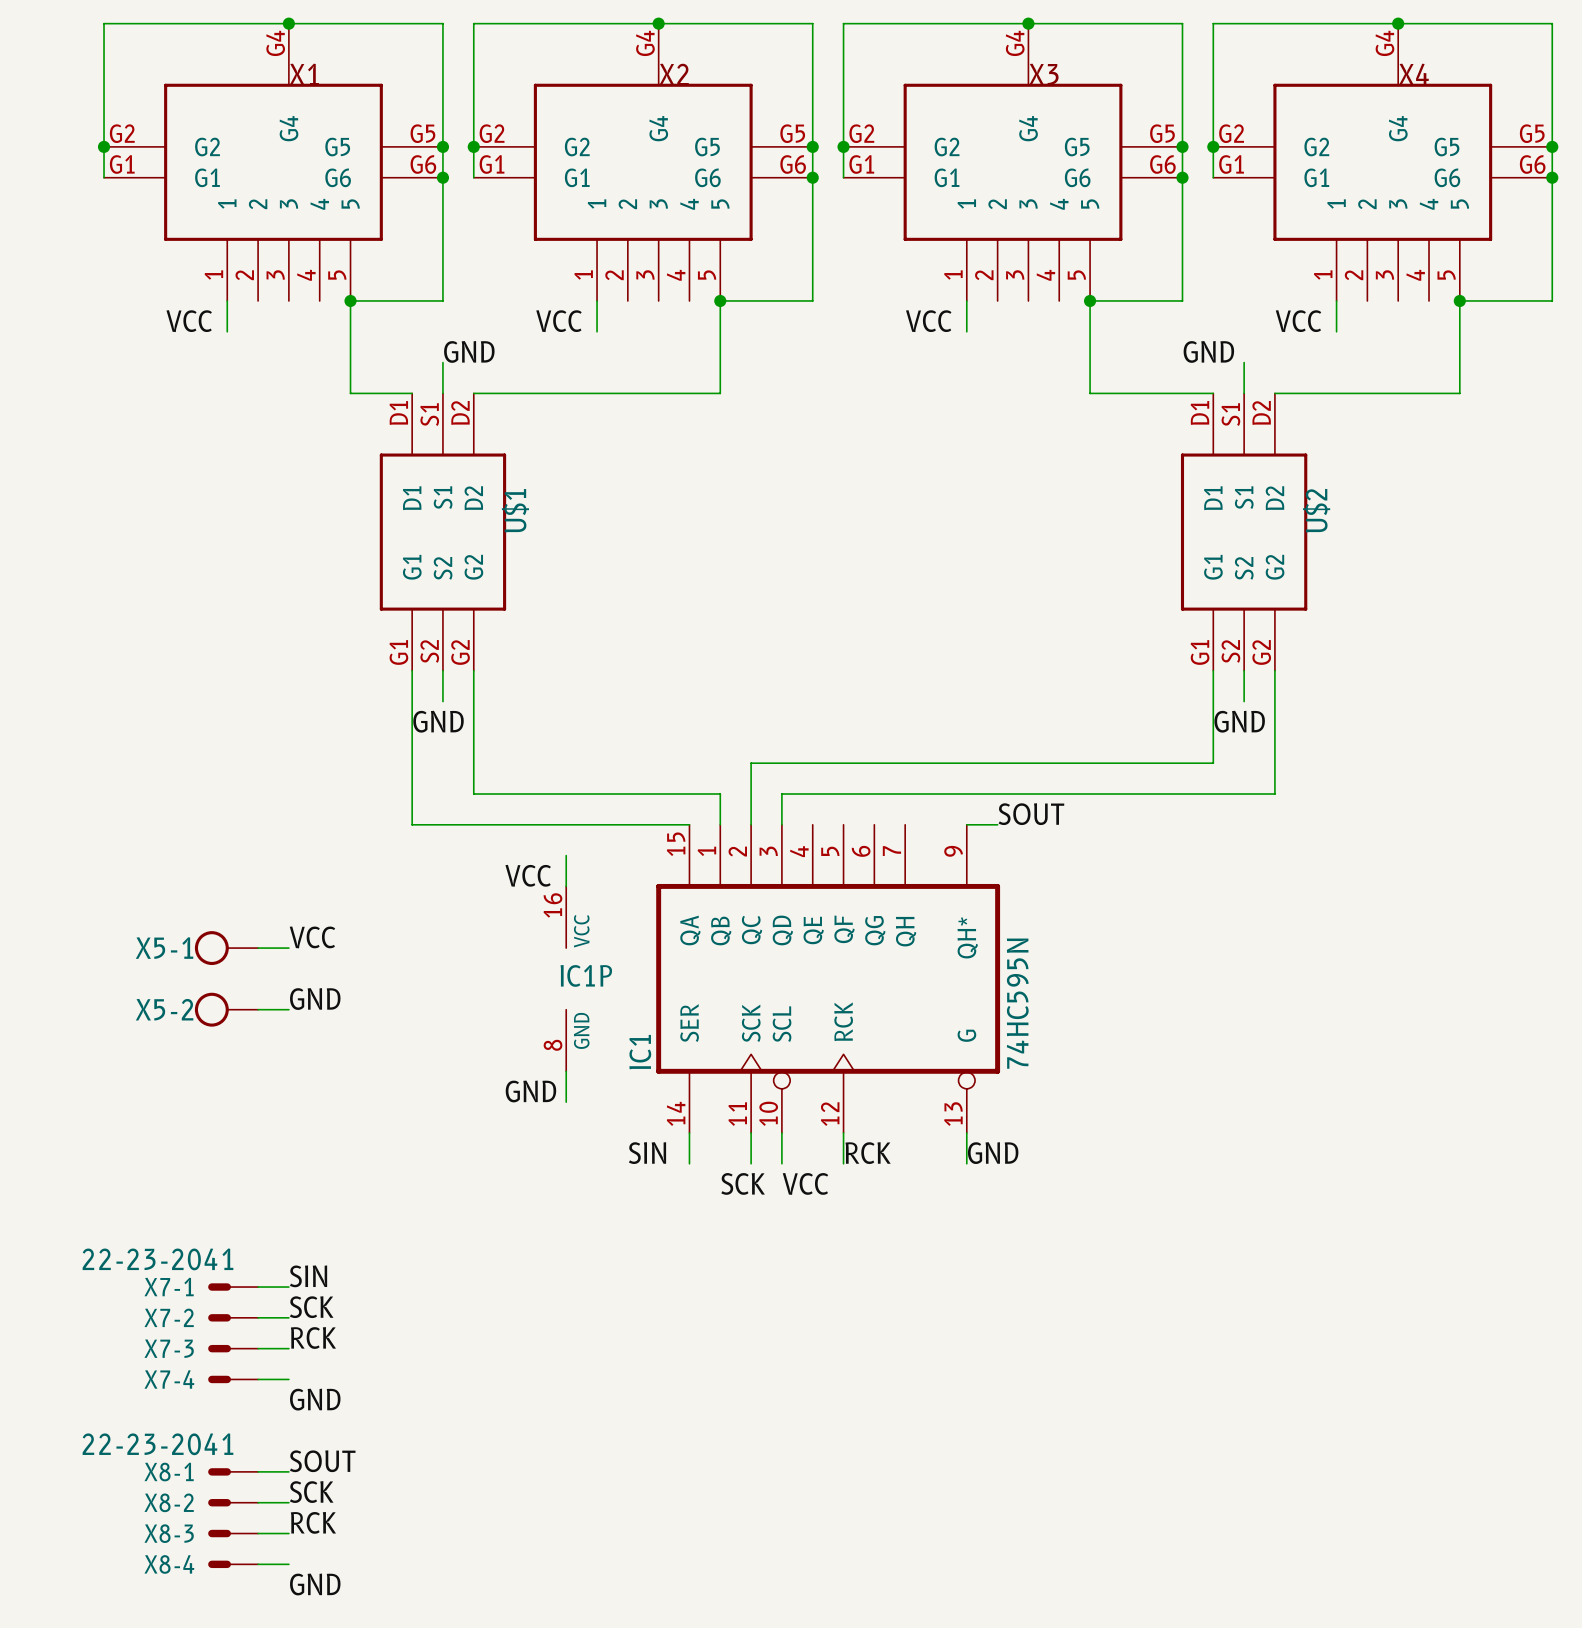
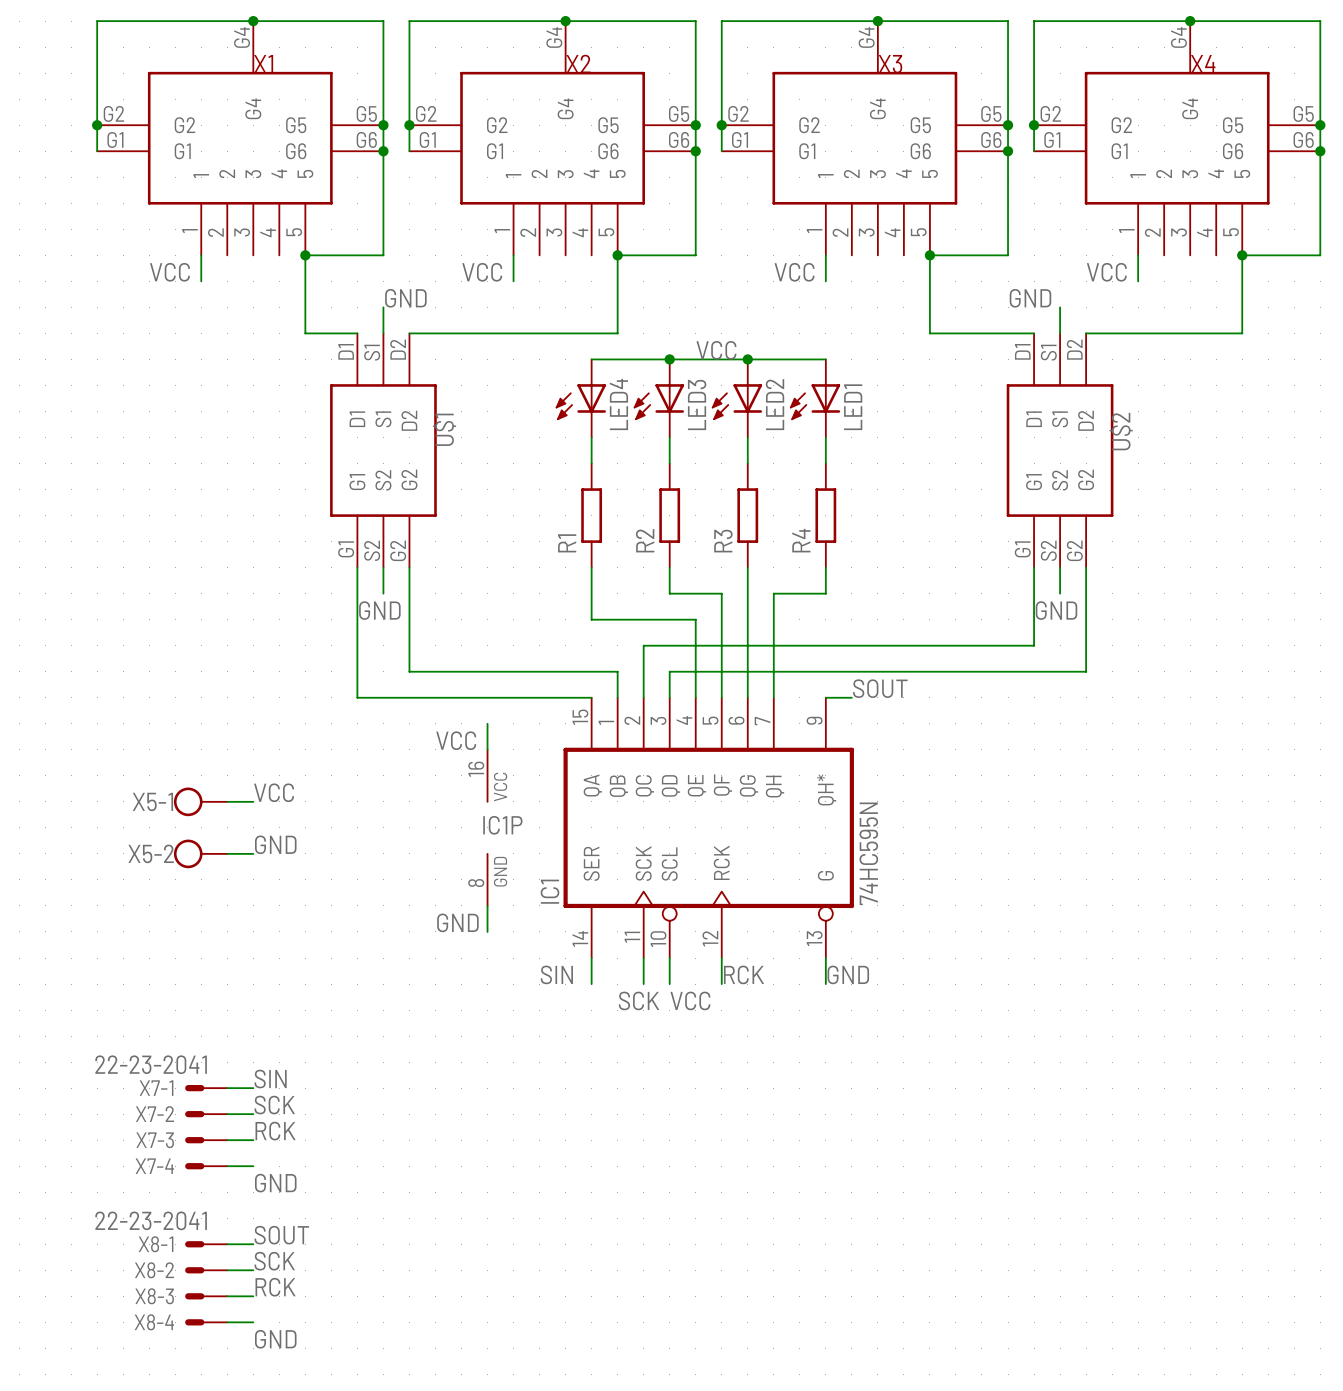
label: none -> VCC (716, 350)
wire: none -> (591, 359) (825, 359)
junction: none -> (669, 359)
junction: none -> (747, 359)
LED4: none -> (580, 398)
LED3: none -> (658, 398)
LED2: none -> (736, 398)
LED1: none -> (815, 398)
wire: none -> (591, 437) (591, 463)
wire: none -> (669, 437) (669, 463)
wire: none -> (747, 437) (747, 463)
wire: none -> (825, 437) (825, 463)
R1: none -> (591, 515)
R2: none -> (669, 515)
R3: none -> (747, 515)
R4: none -> (825, 515)
wire: none -> (591, 567) (591, 619) (695, 619) (695, 697)
wire: none -> (669, 567) (669, 593) (721, 593) (721, 697)
wire: none -> (747, 567) (747, 697)
wire: none -> (825, 567) (825, 593) (773, 593) (773, 697)

